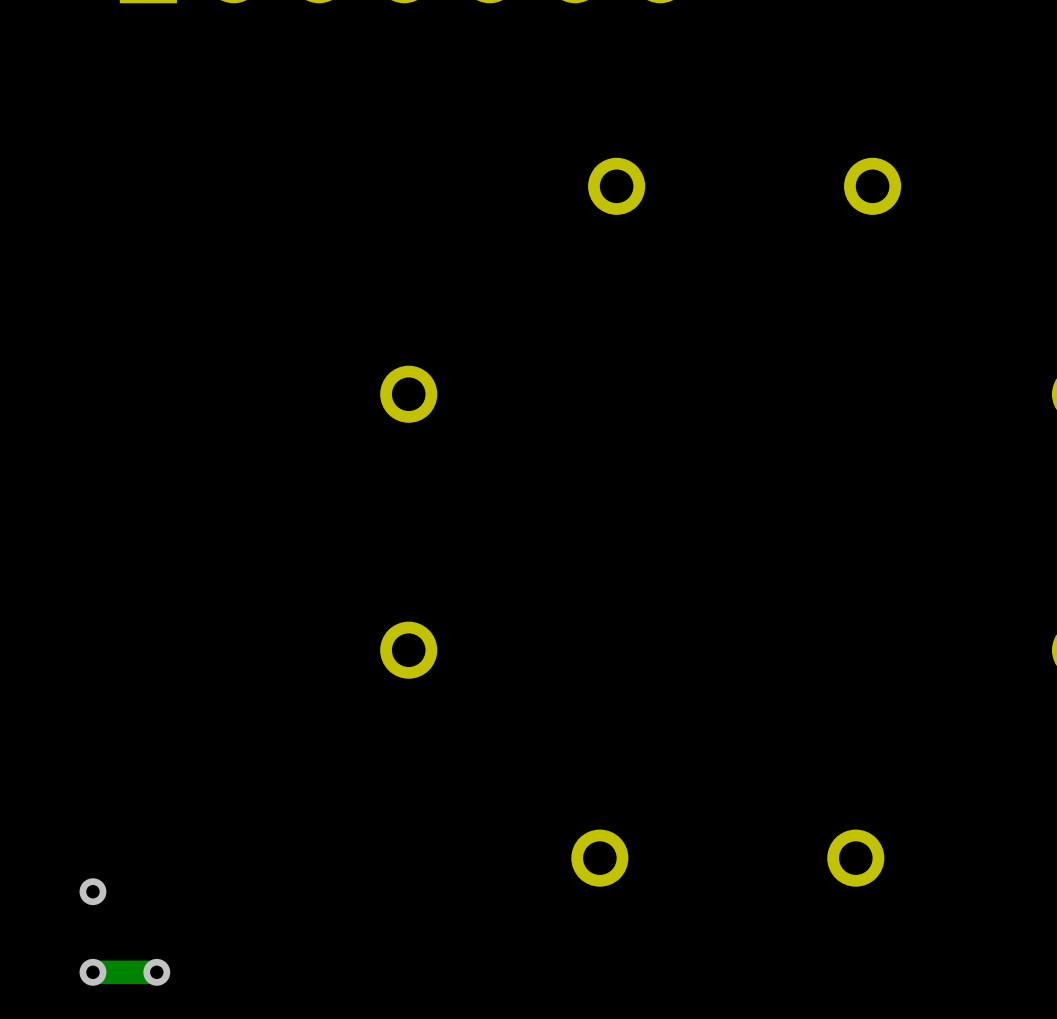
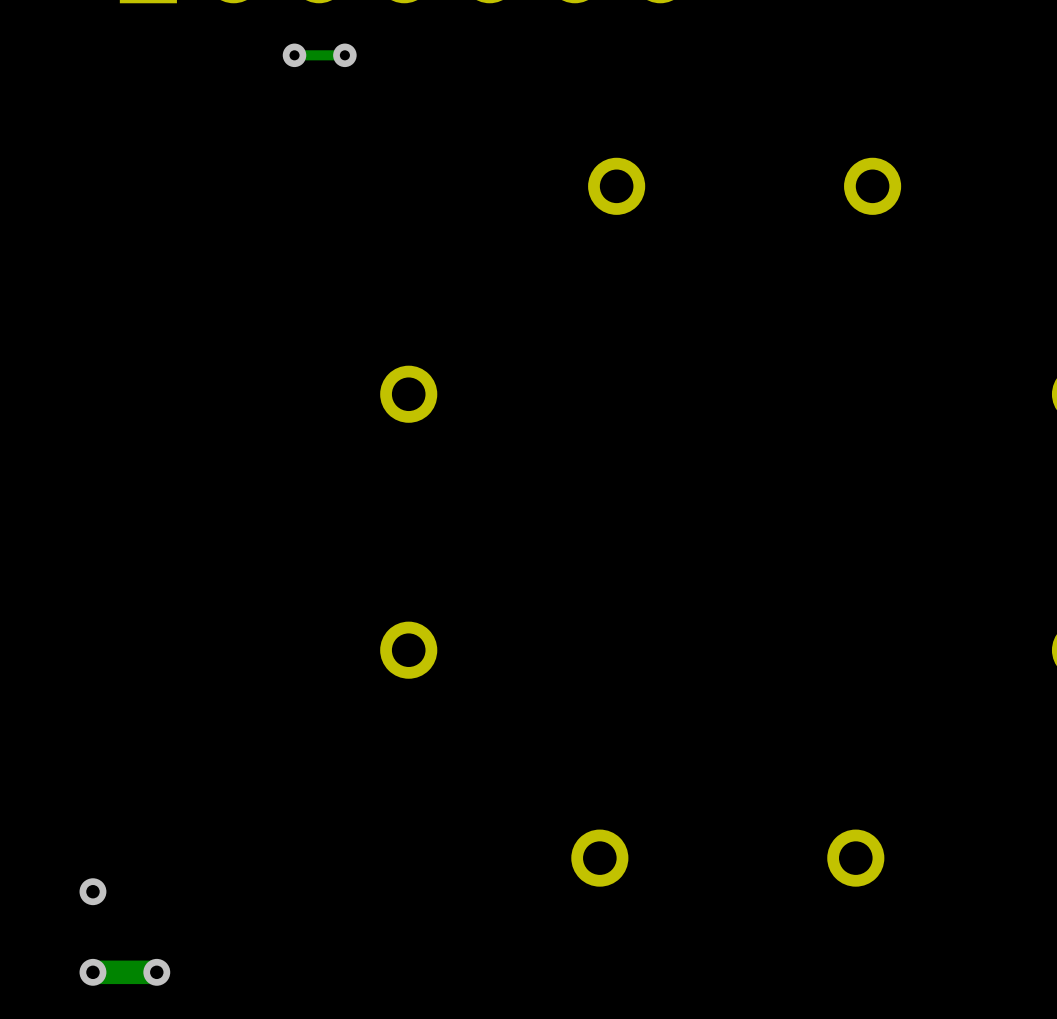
via: none -> (294, 55)
track: none -> (344, 55) (294, 55)
via: none -> (344, 55)

